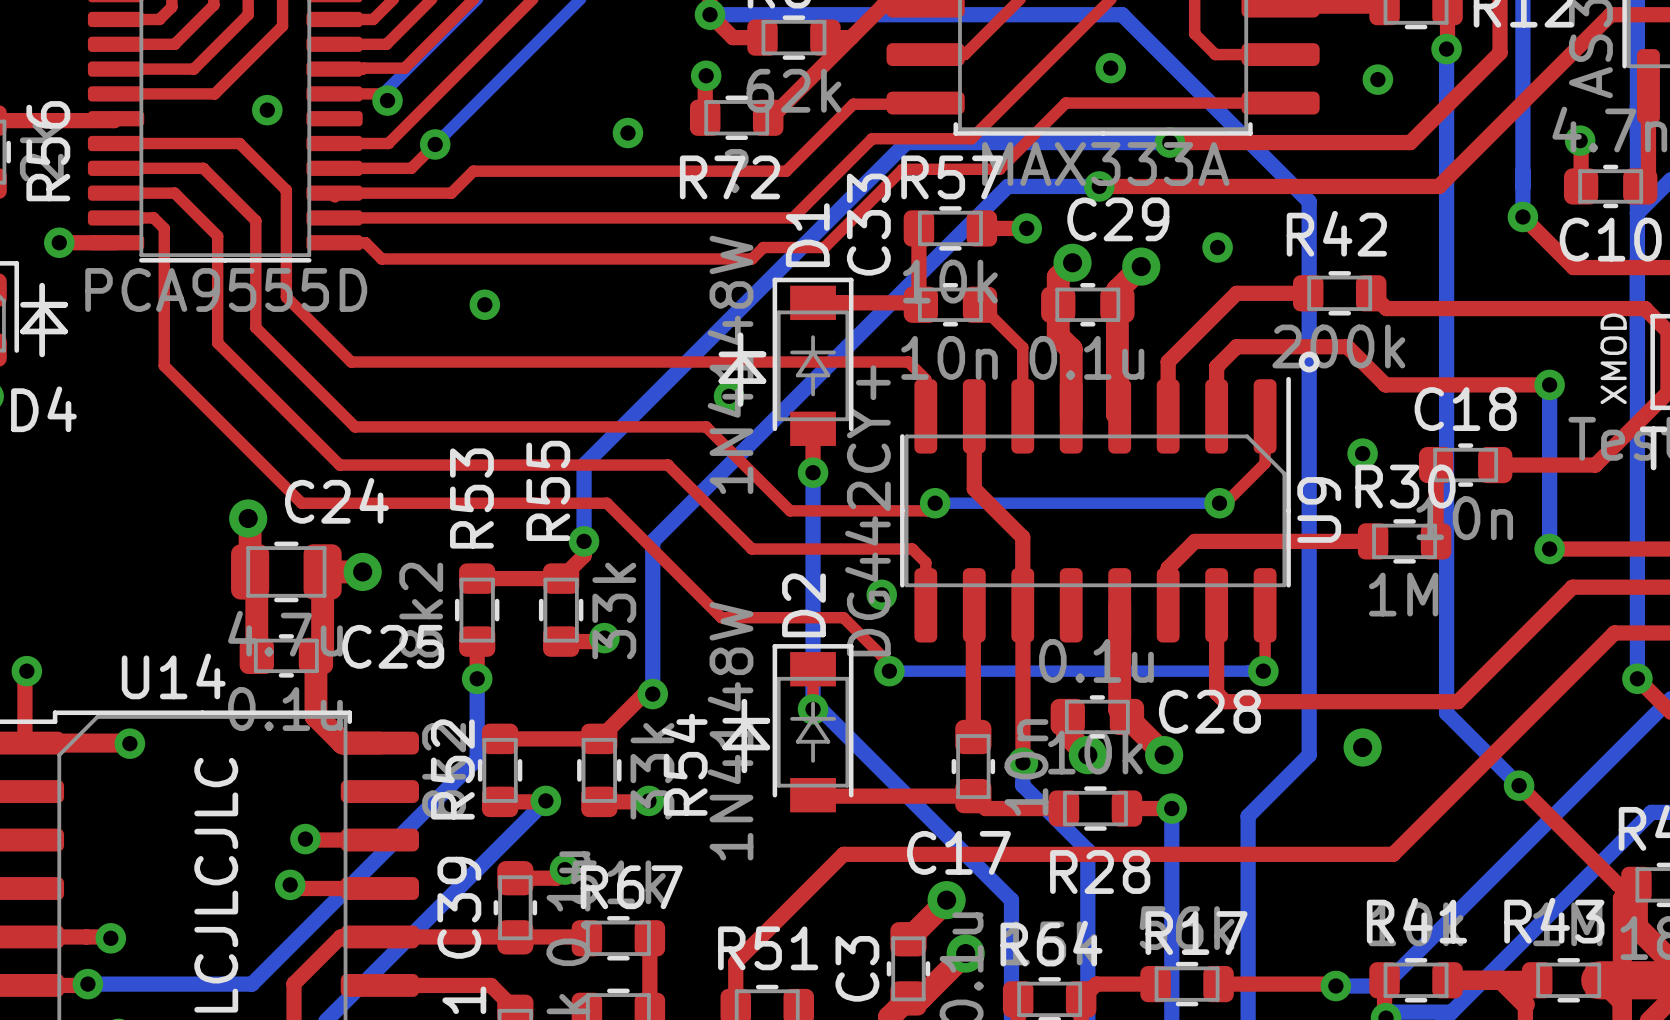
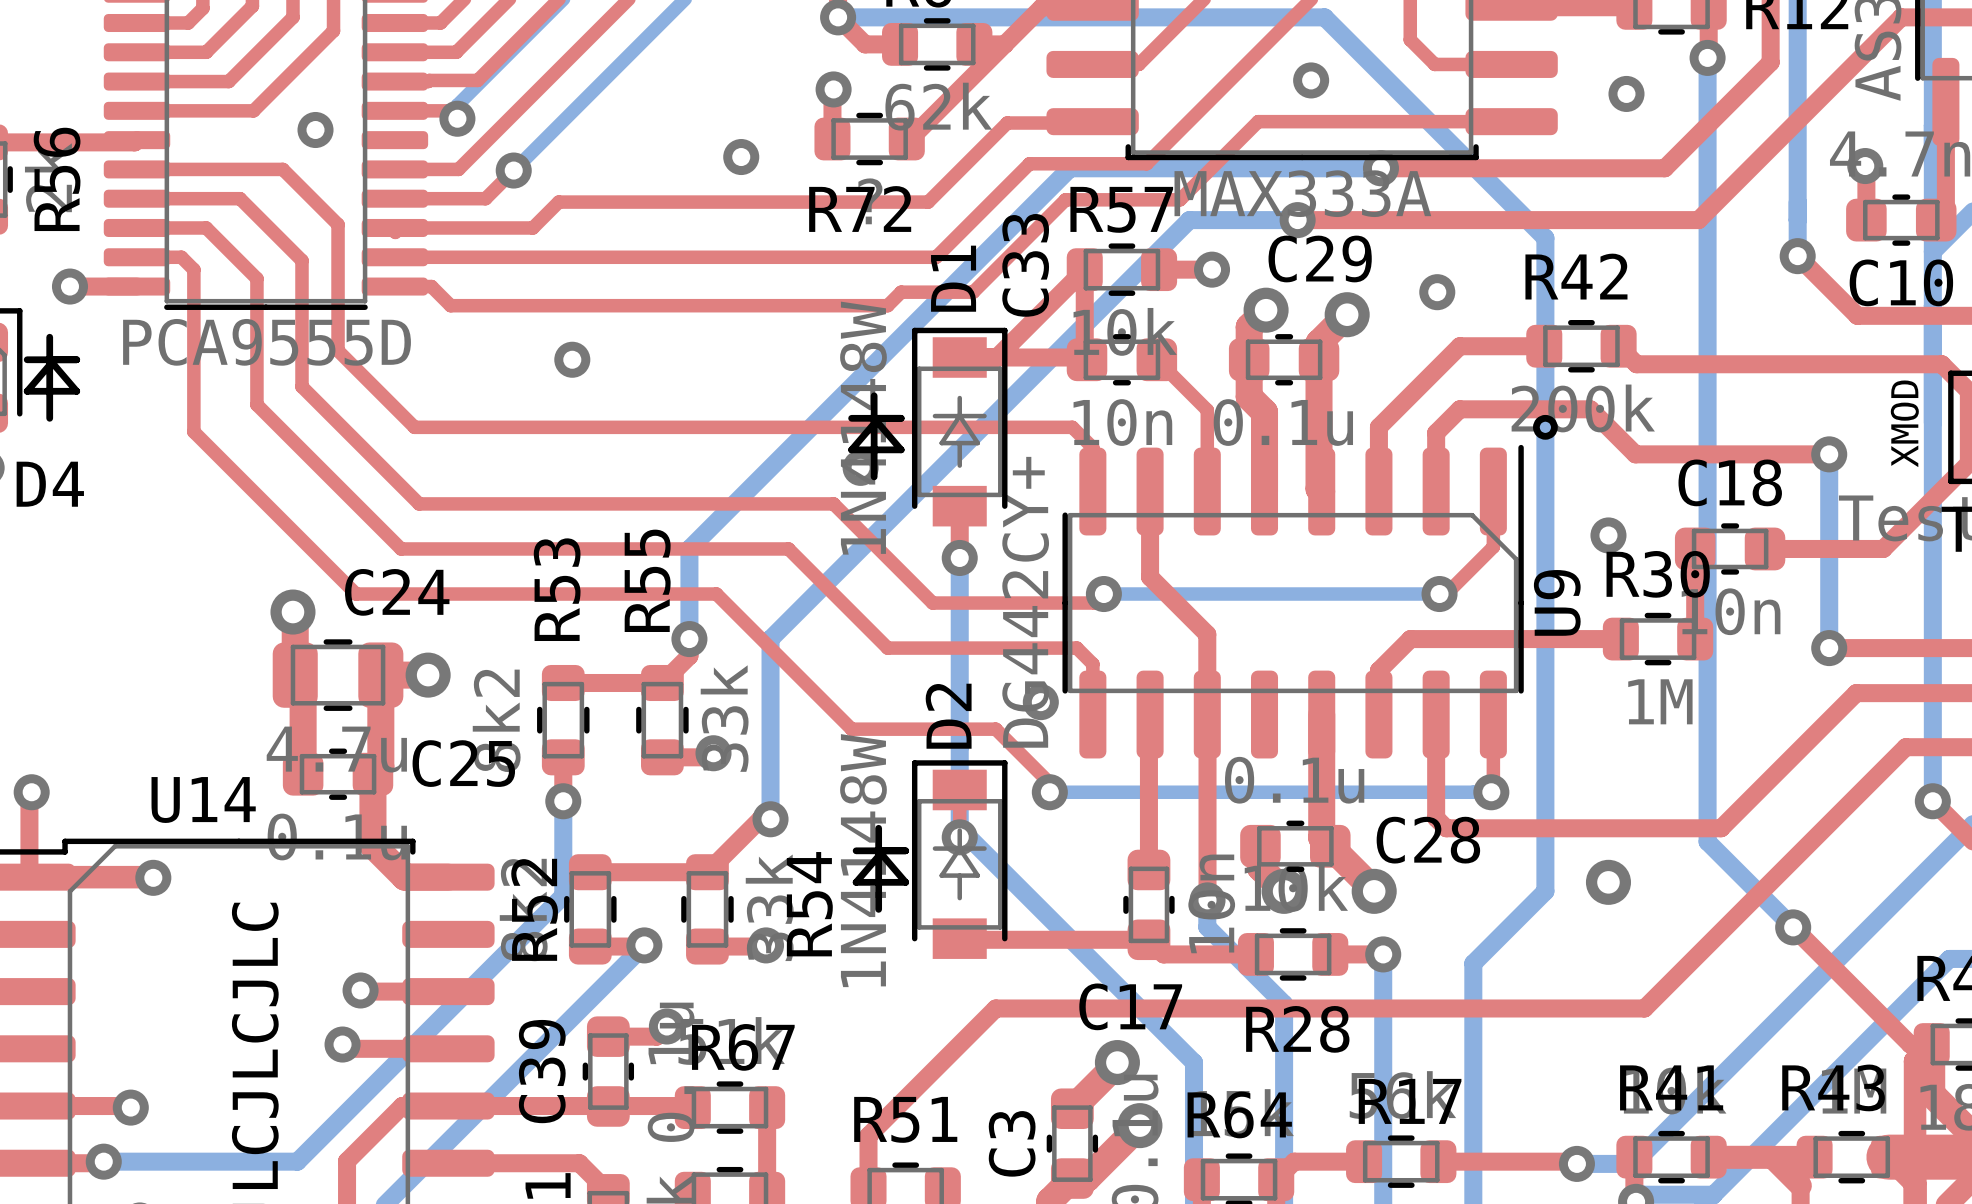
top track: none -> (1084, 269) (996, 357)

